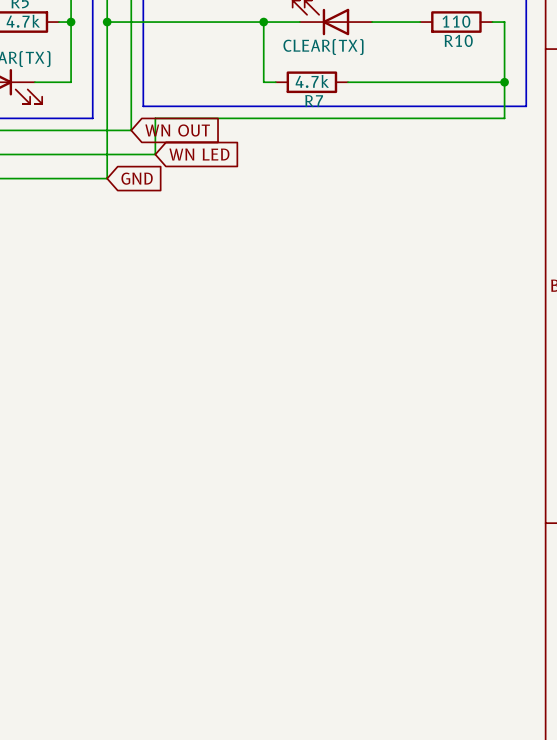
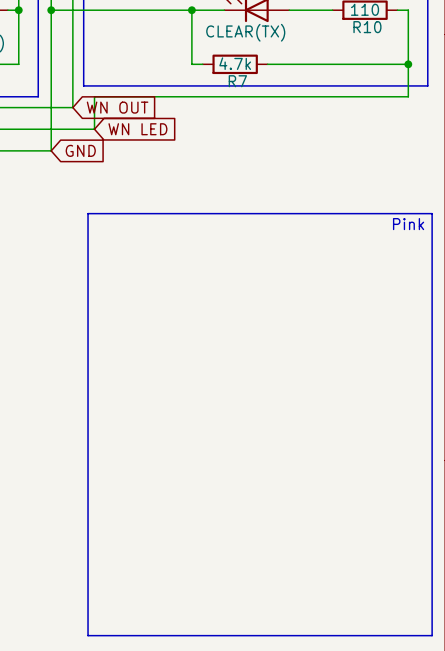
line: none -> (88, 213) (432, 213) (432, 635) (88, 635) (88, 213)
text: none -> Pink (408, 224)

